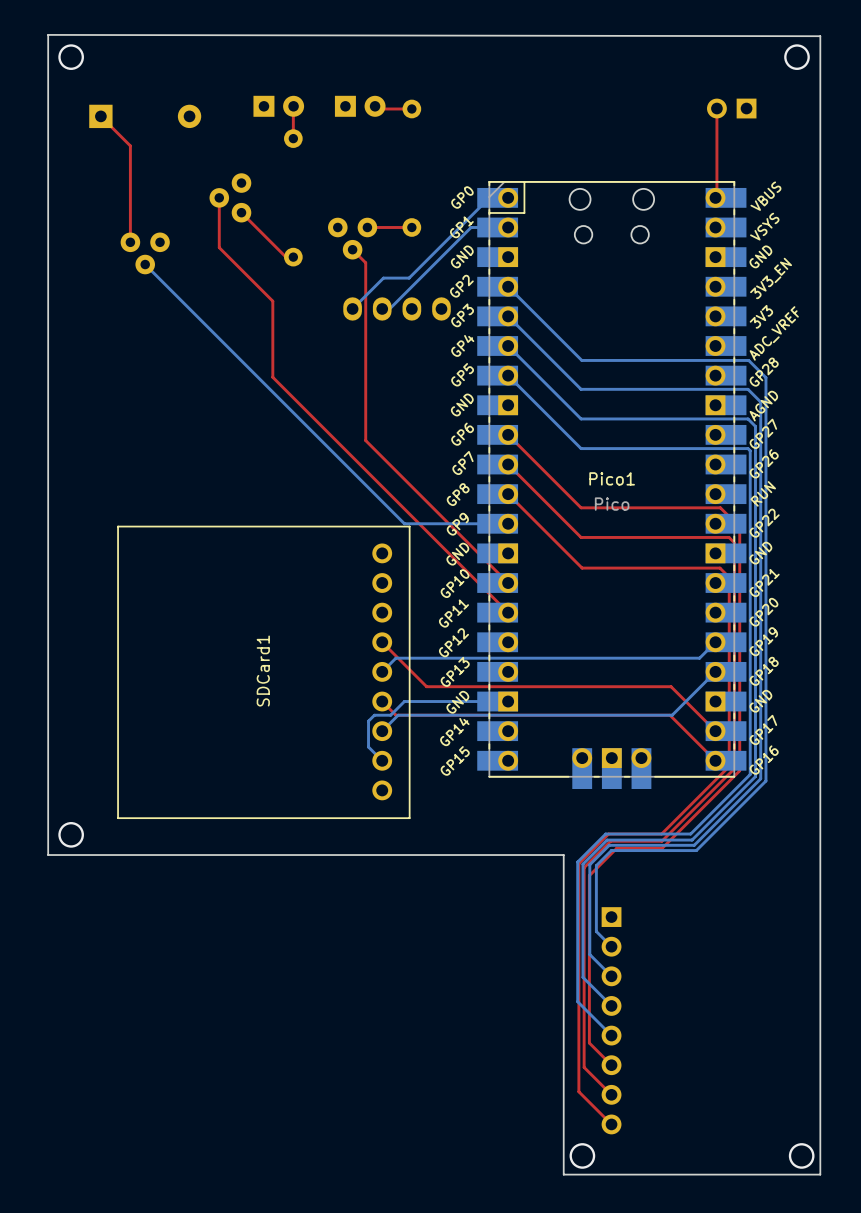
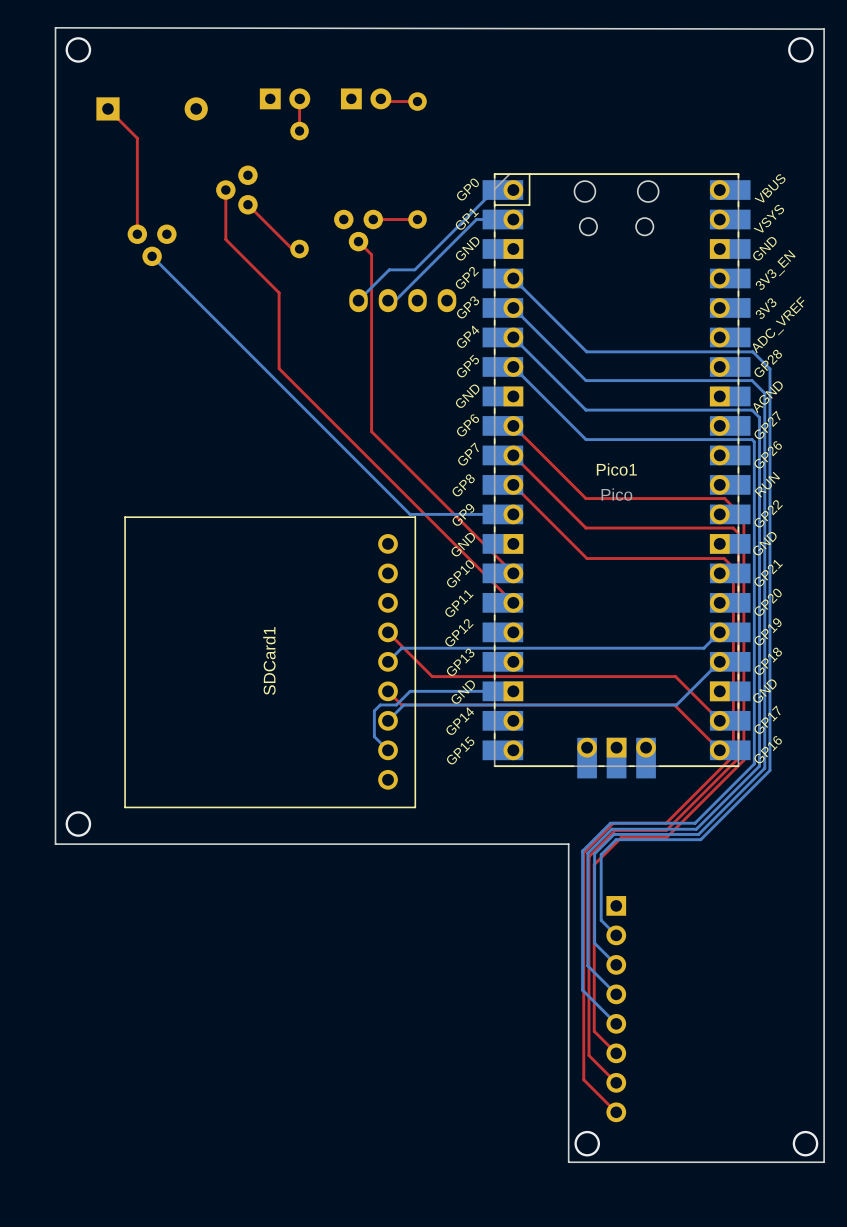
top track: (716, 108) (715, 197) -> none
part: (731, 108) -> none

